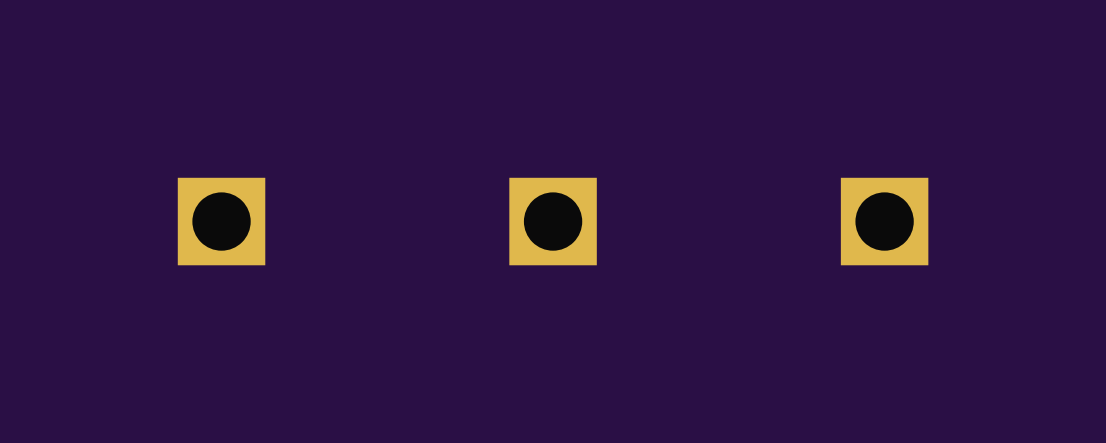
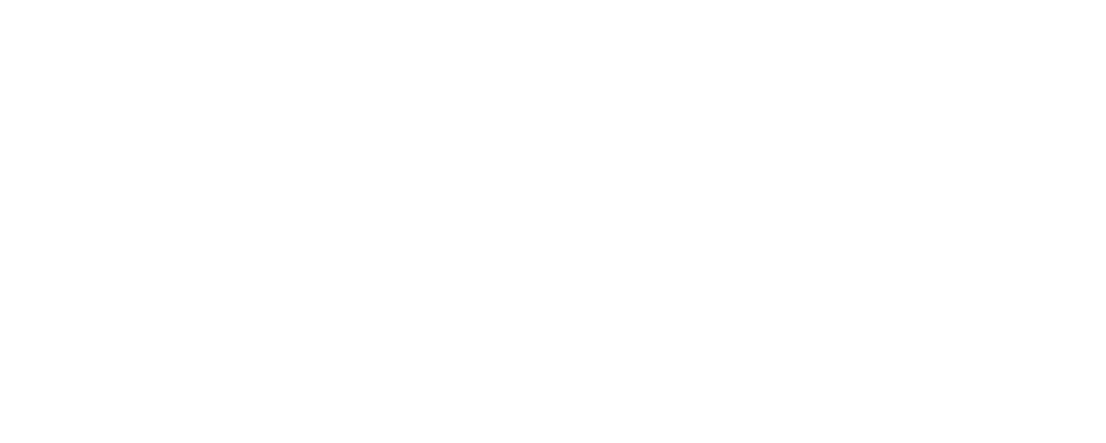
part: (221, 221) -> none
part: (553, 221) -> none
part: (884, 221) -> none

